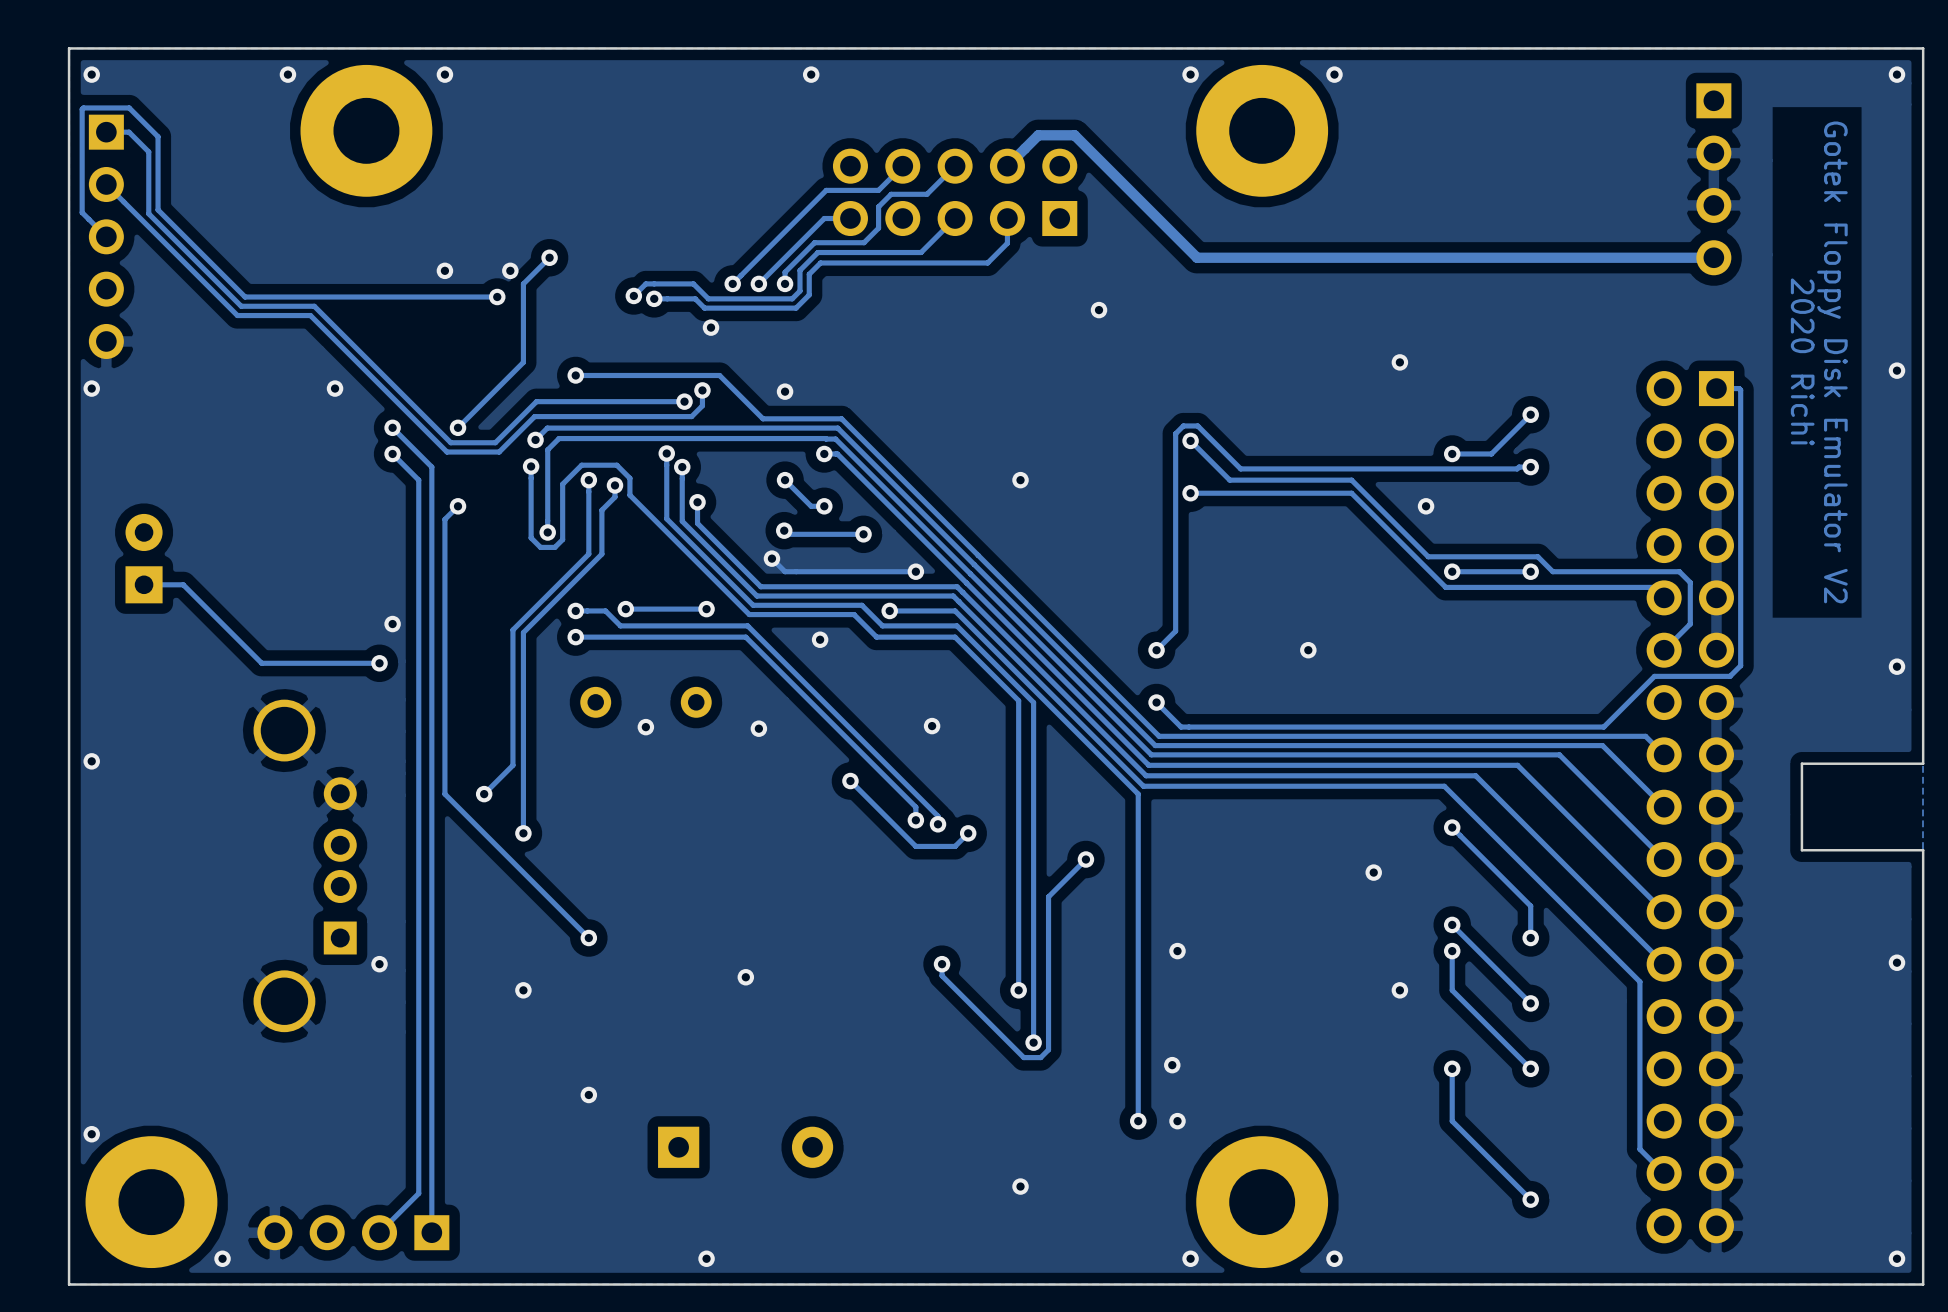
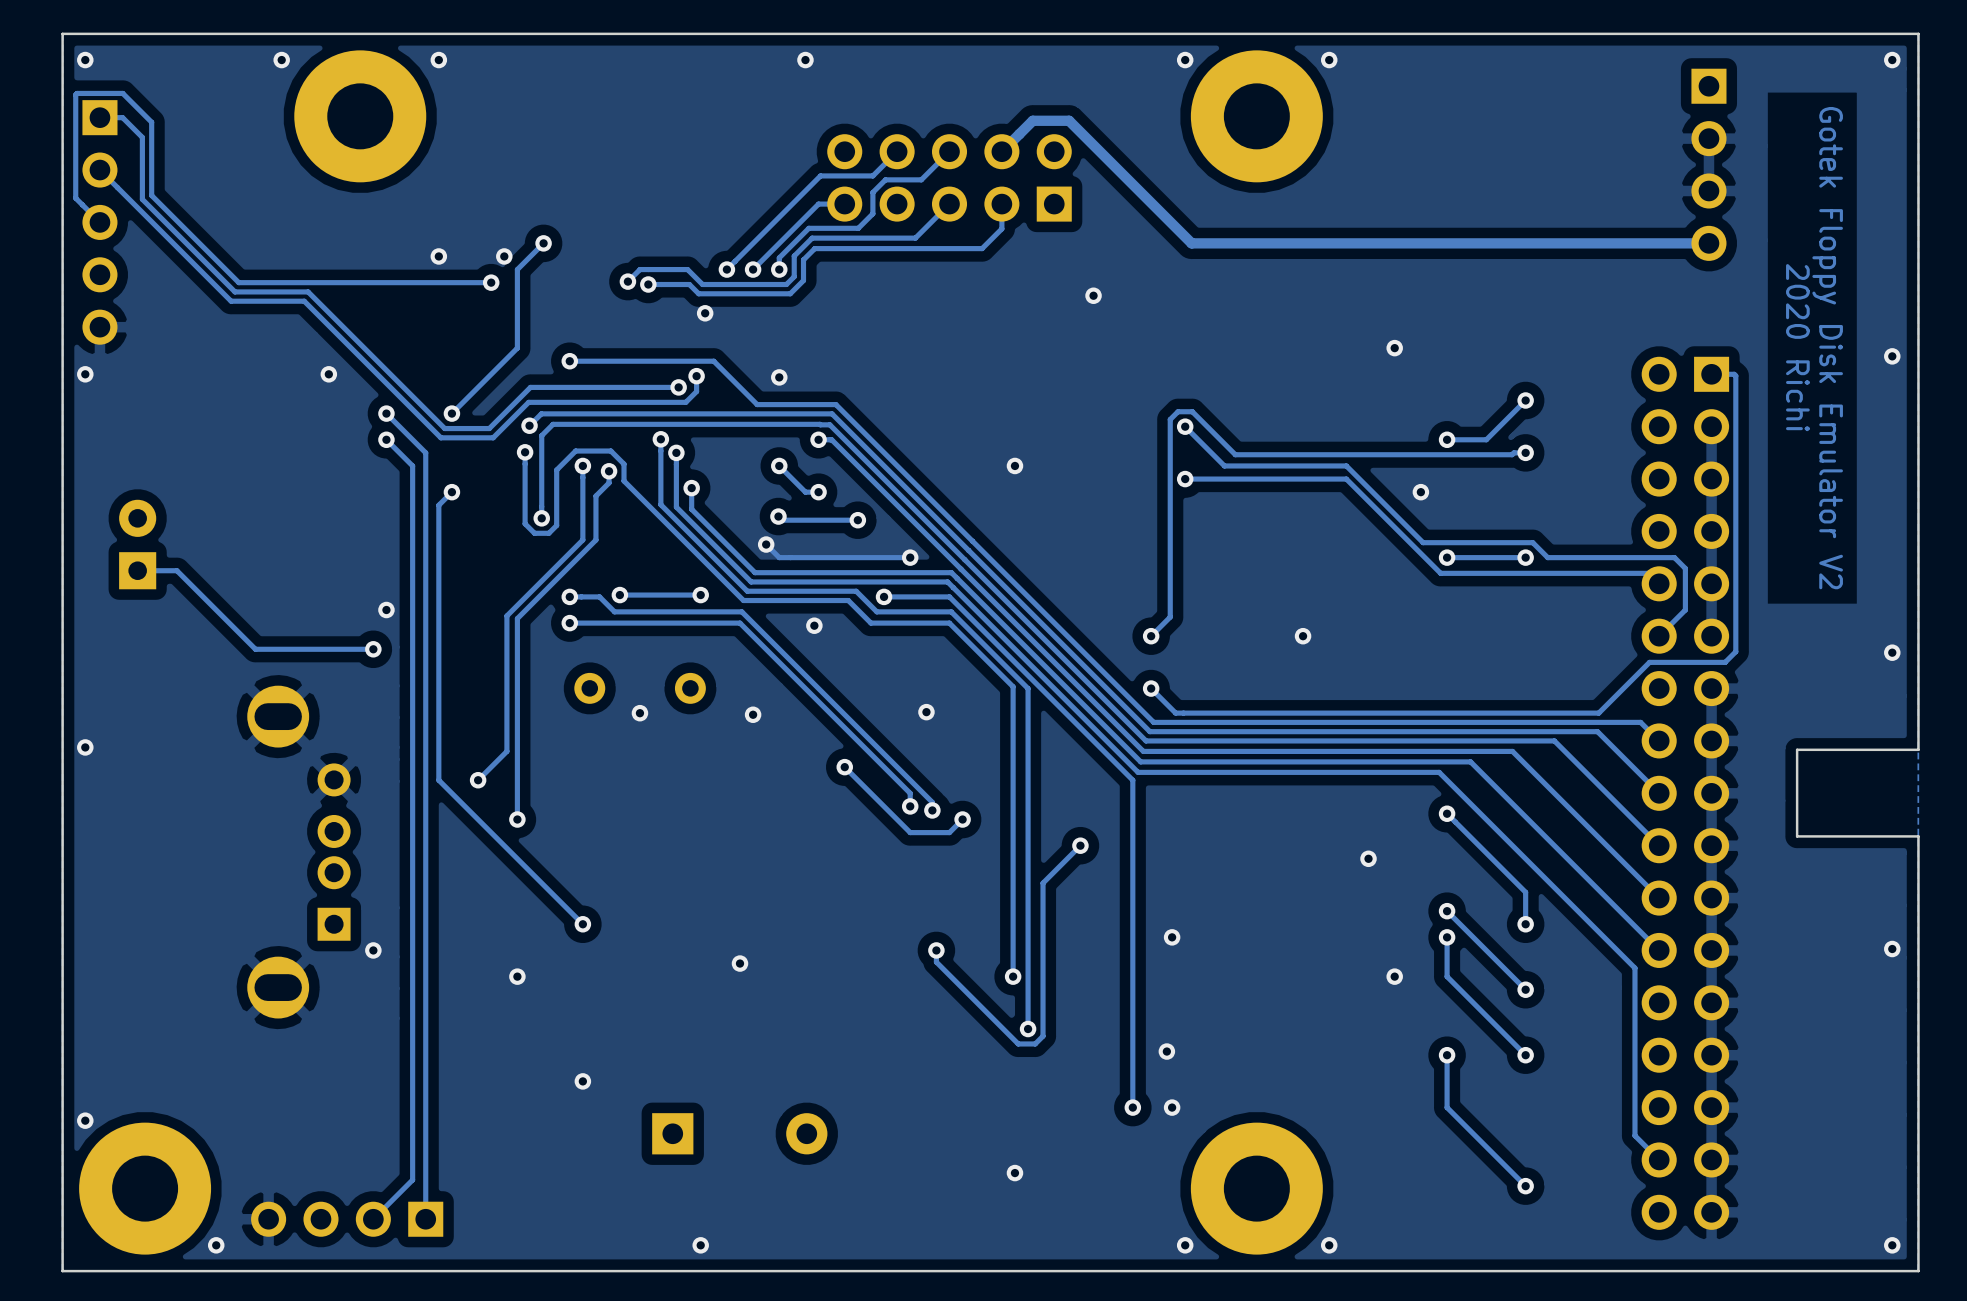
part footprint: [253, 699, 357, 1033] -> [247, 685, 351, 1019]

